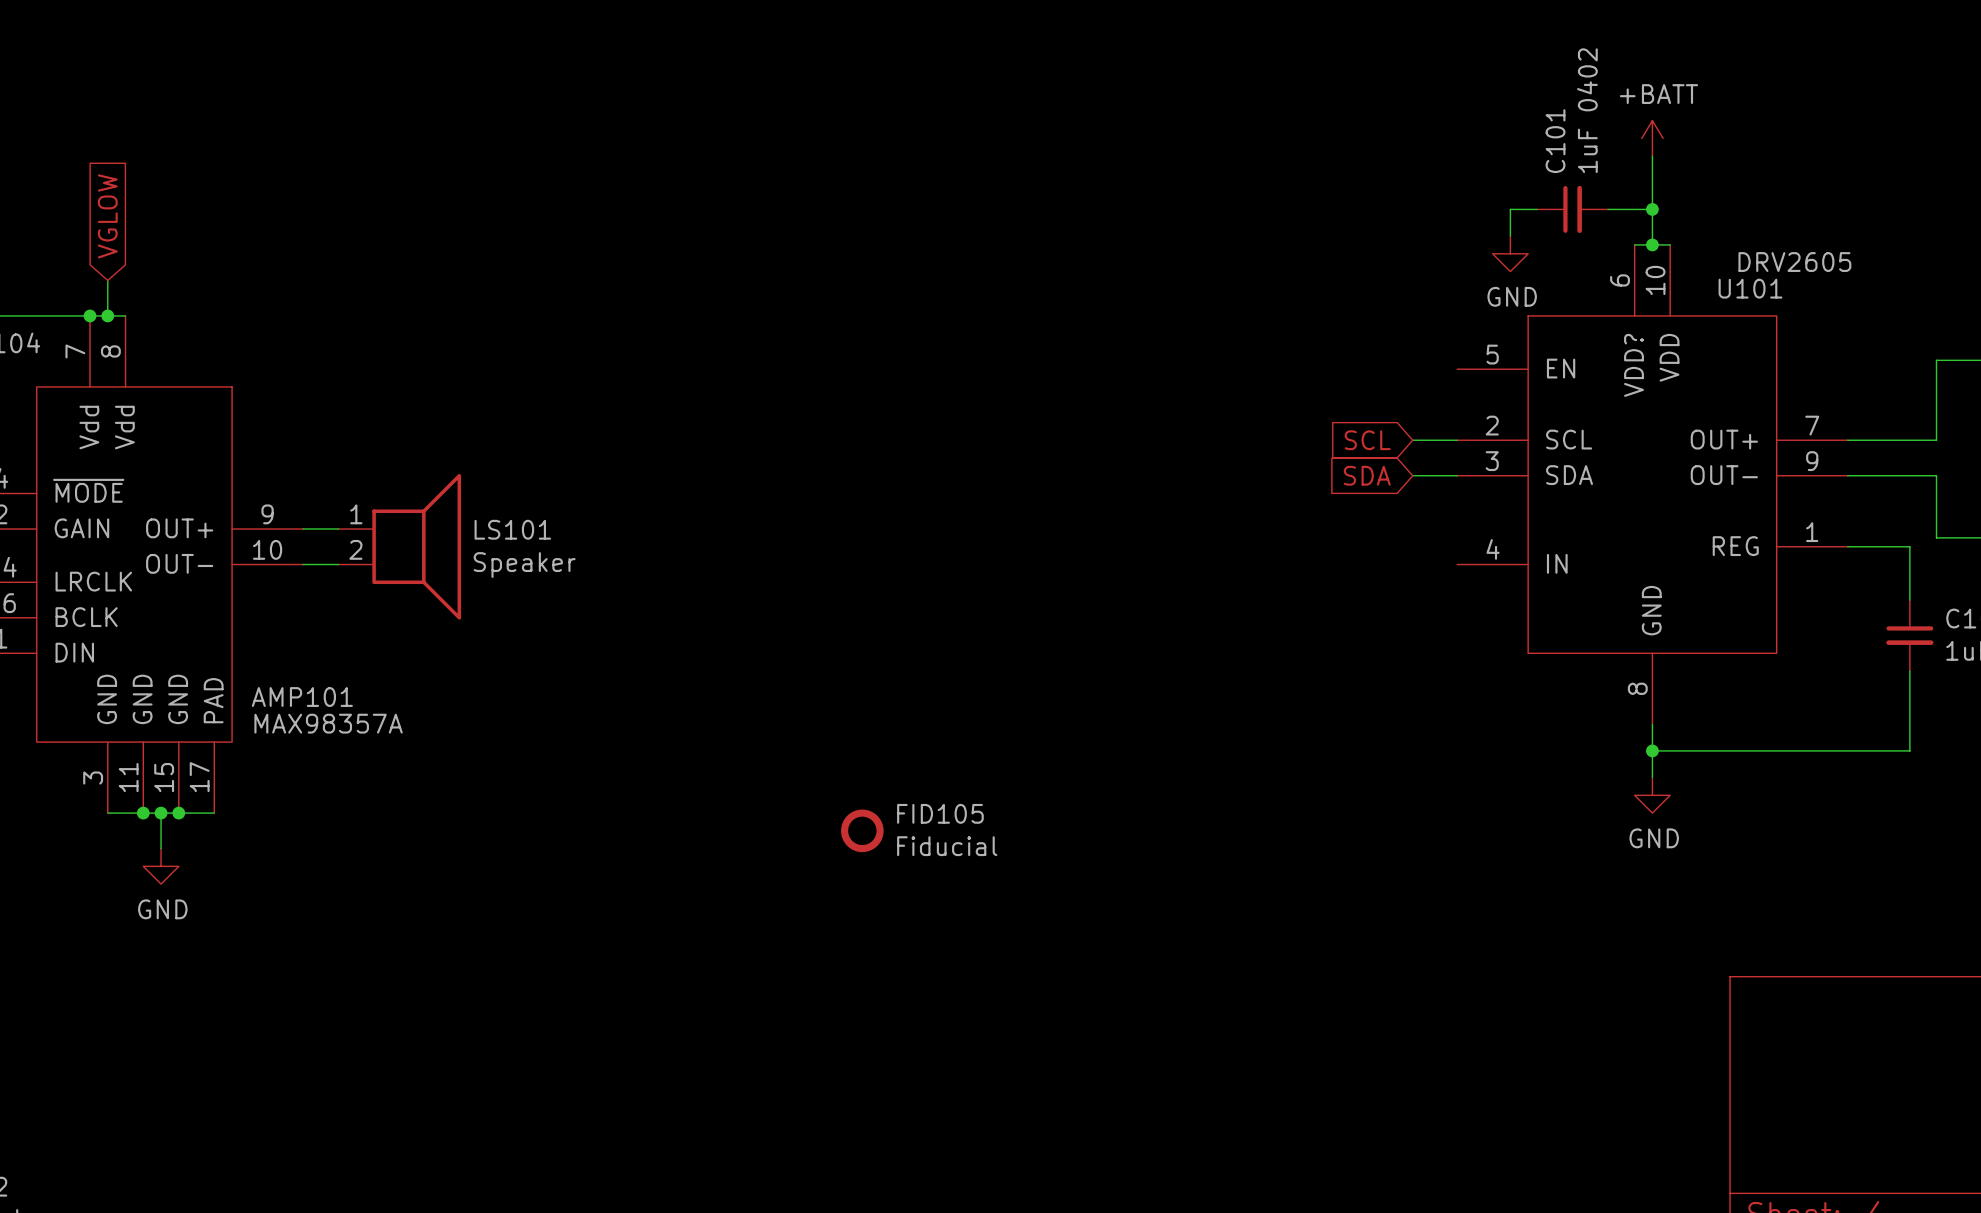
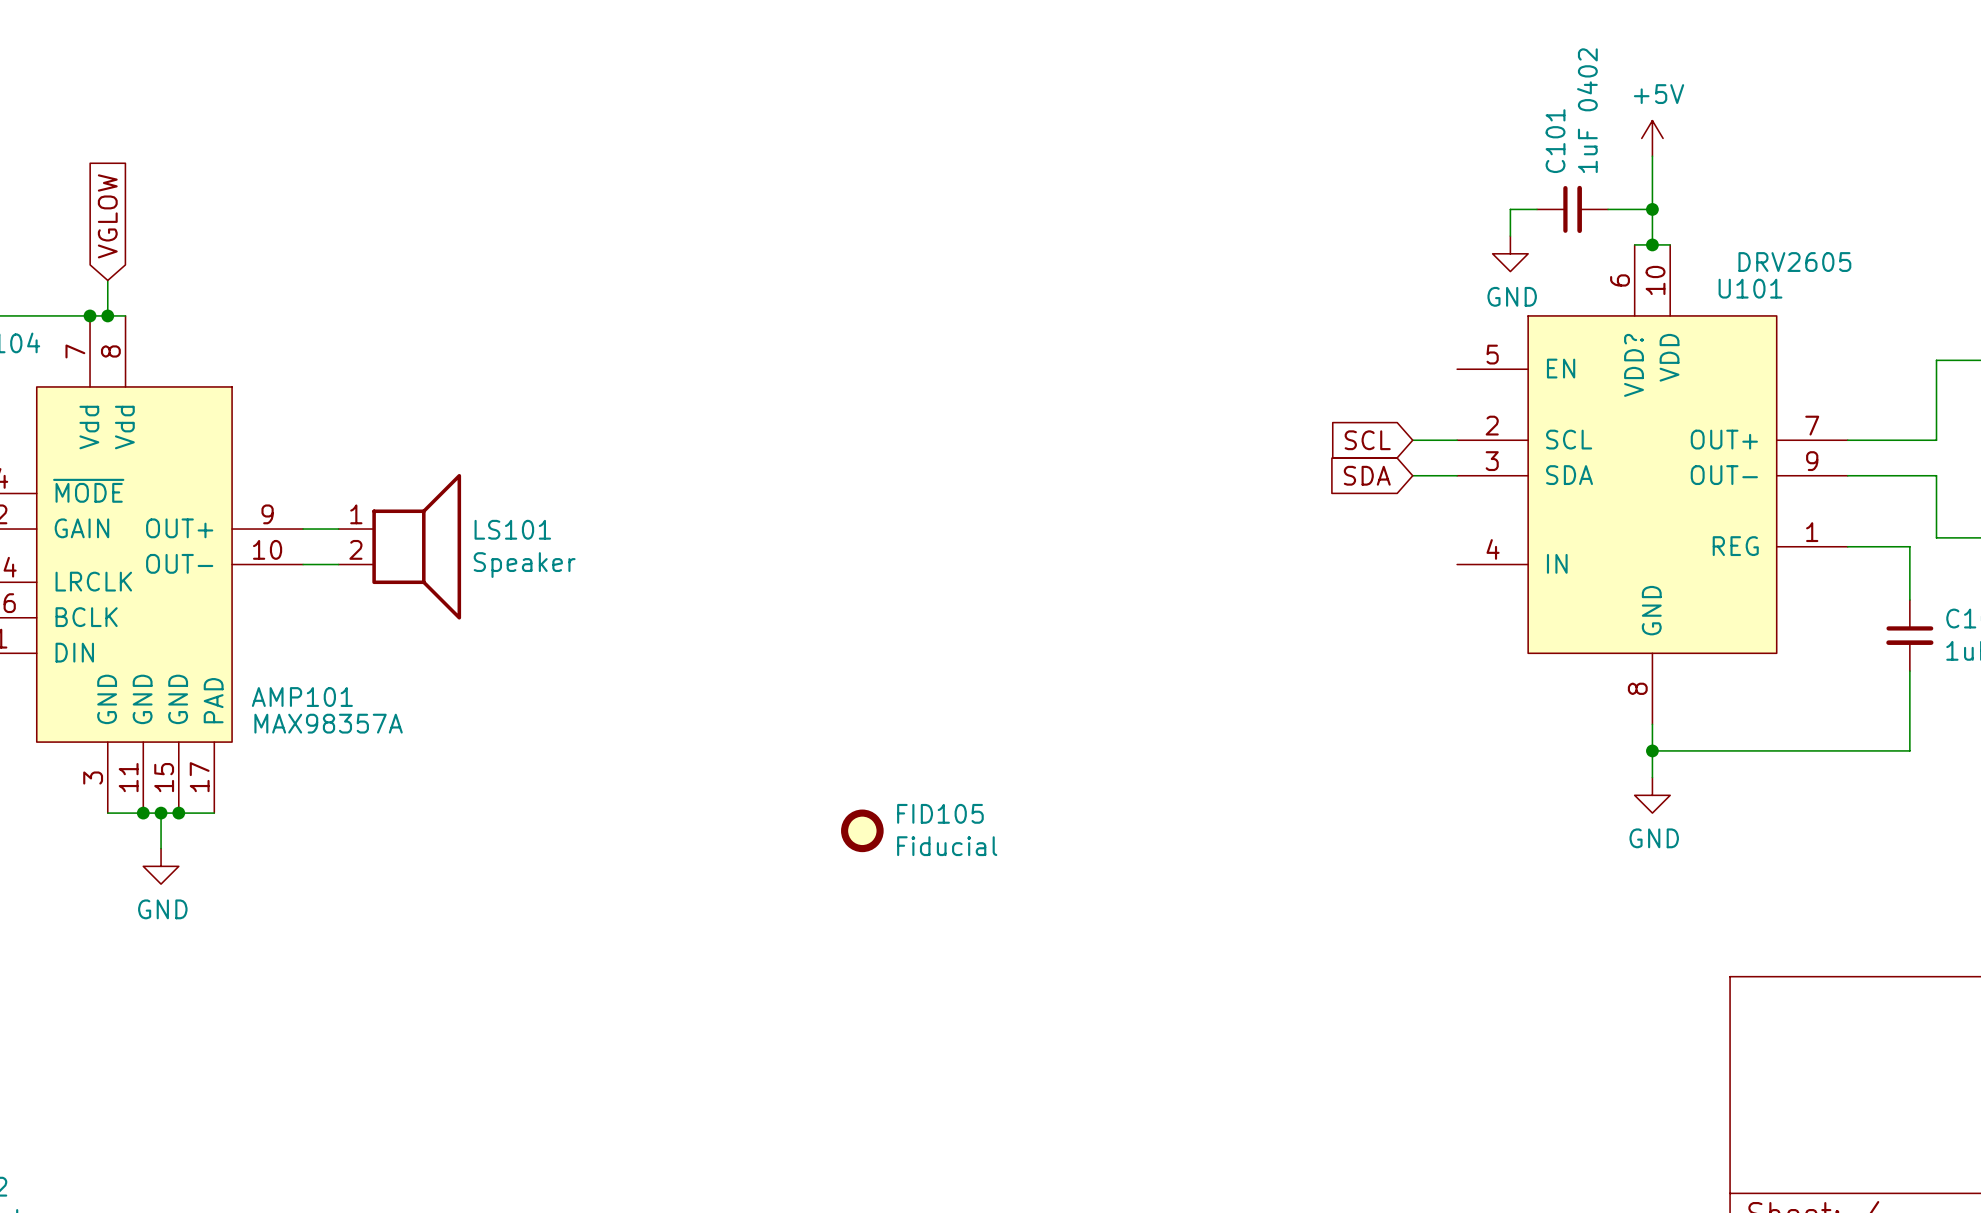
power symbol: +BATT (1652, 138) -> +5V (1652, 138)

